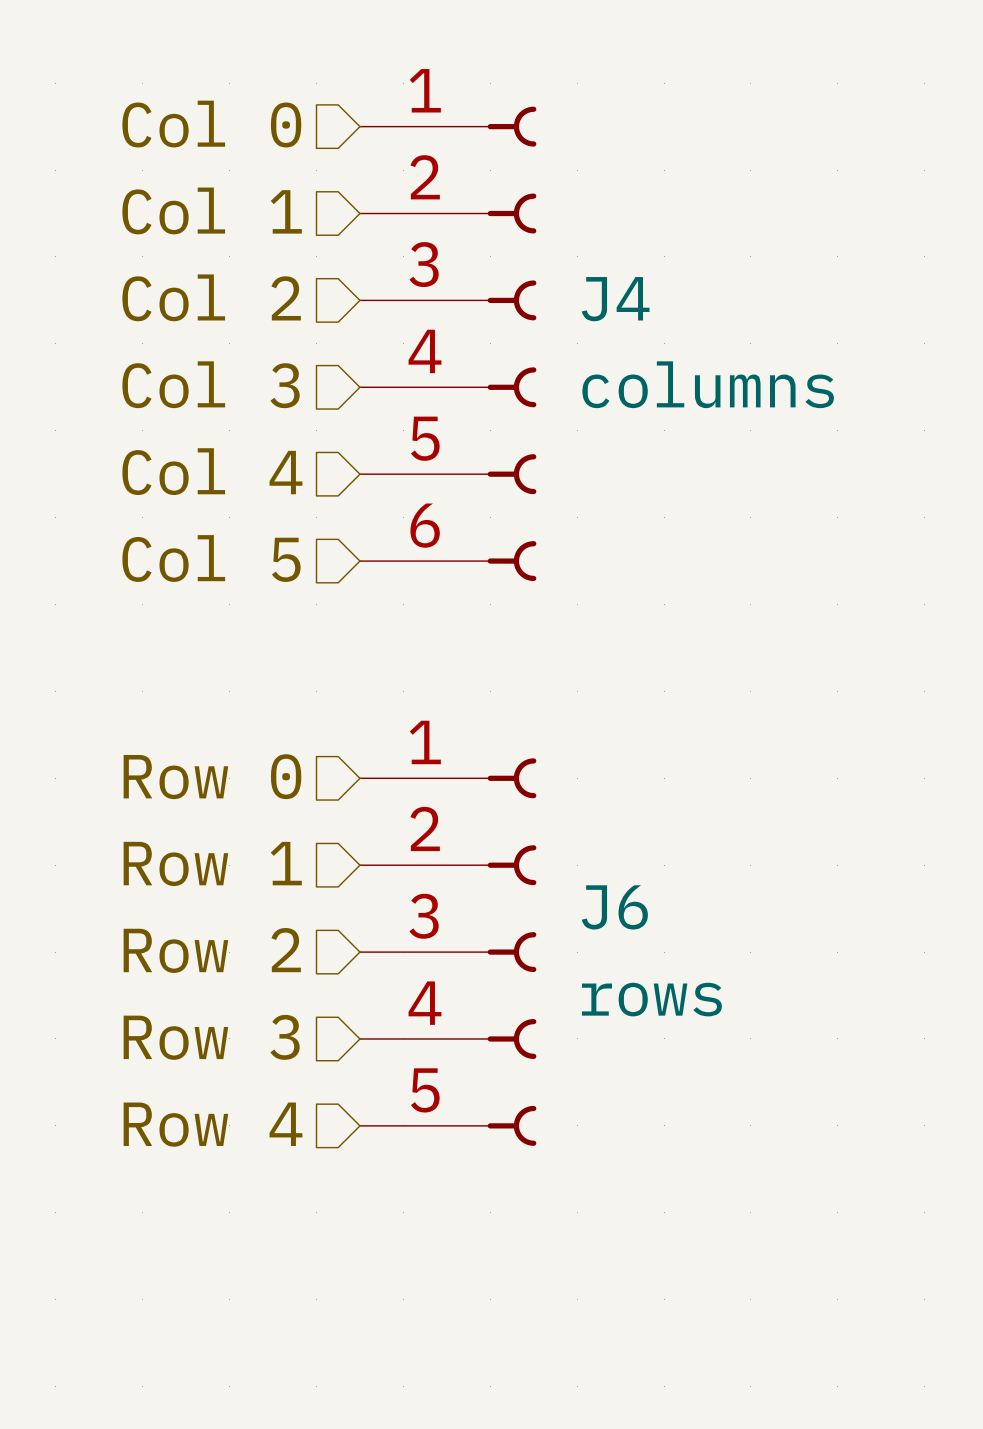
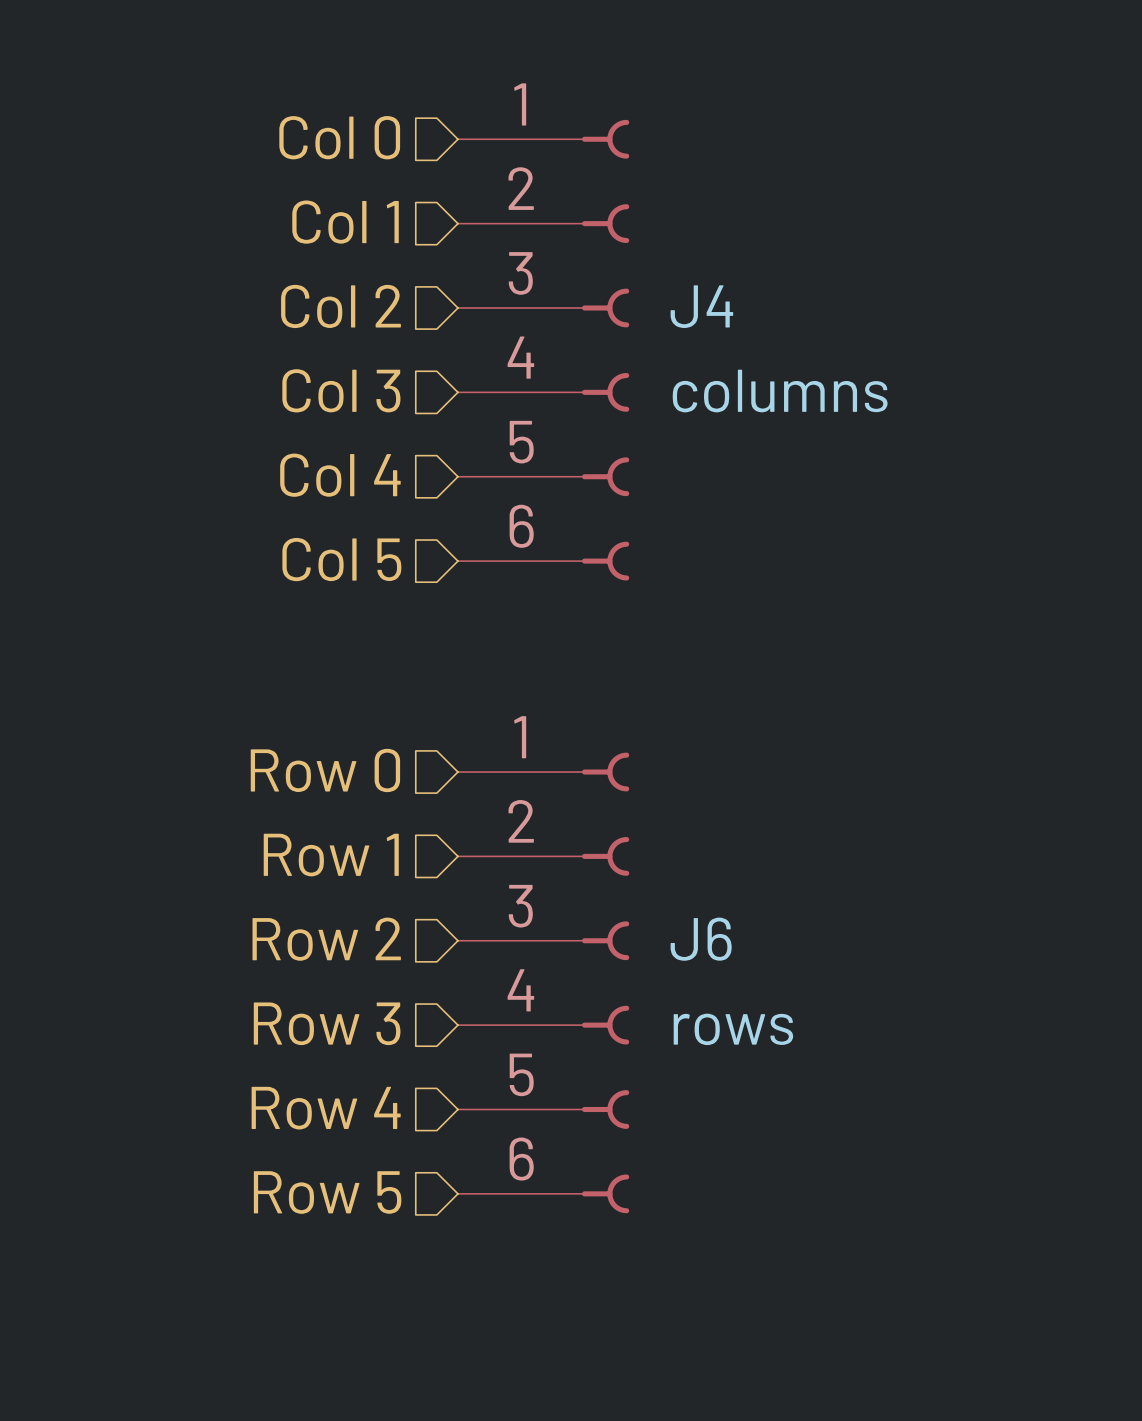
J6 symbol: [359, 758, 537, 1146] -> [457, 752, 630, 1214]
hierarchical label: none -> Row 5 (327, 1192)

